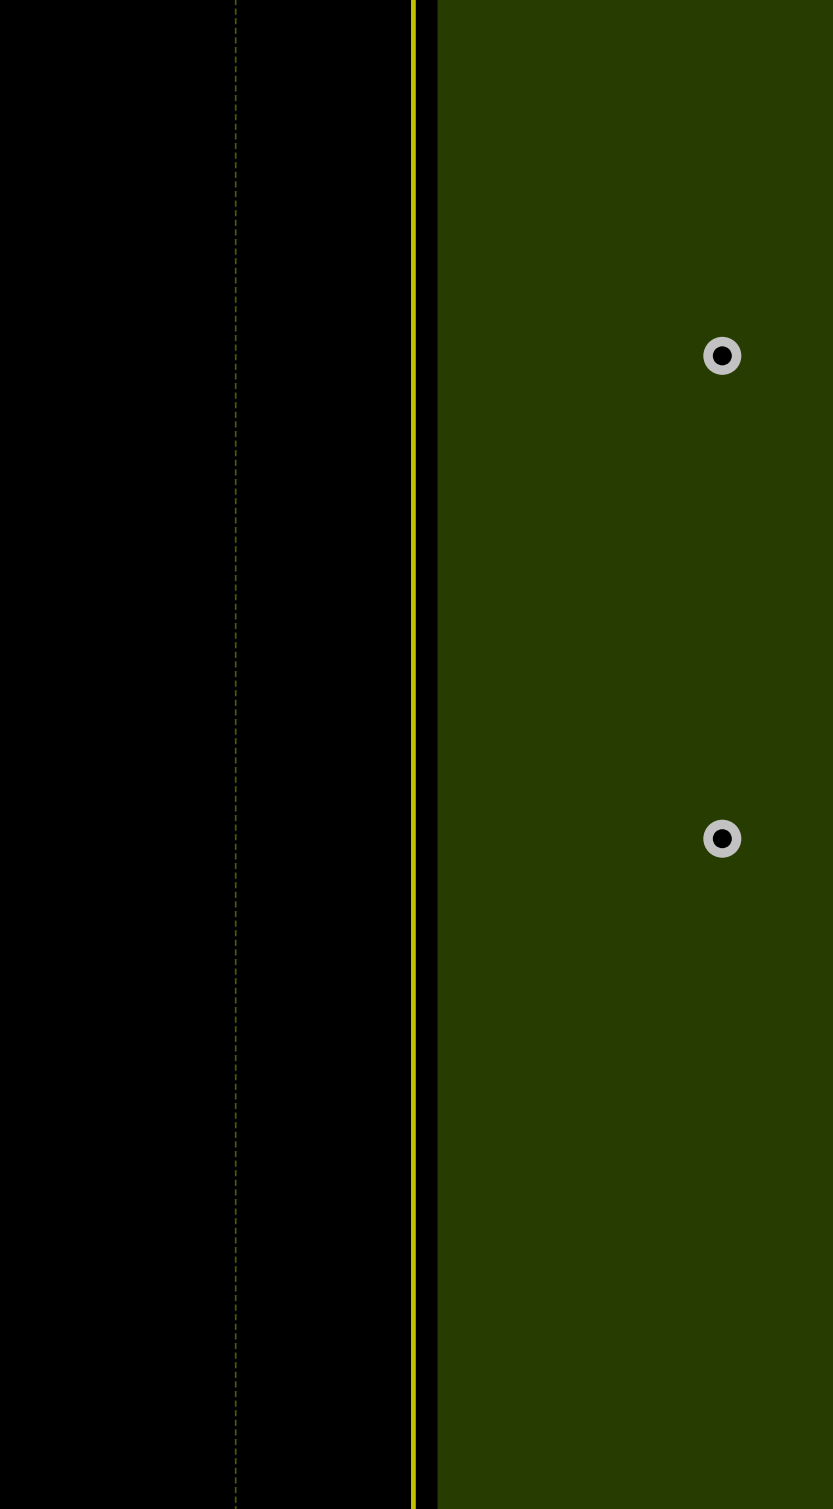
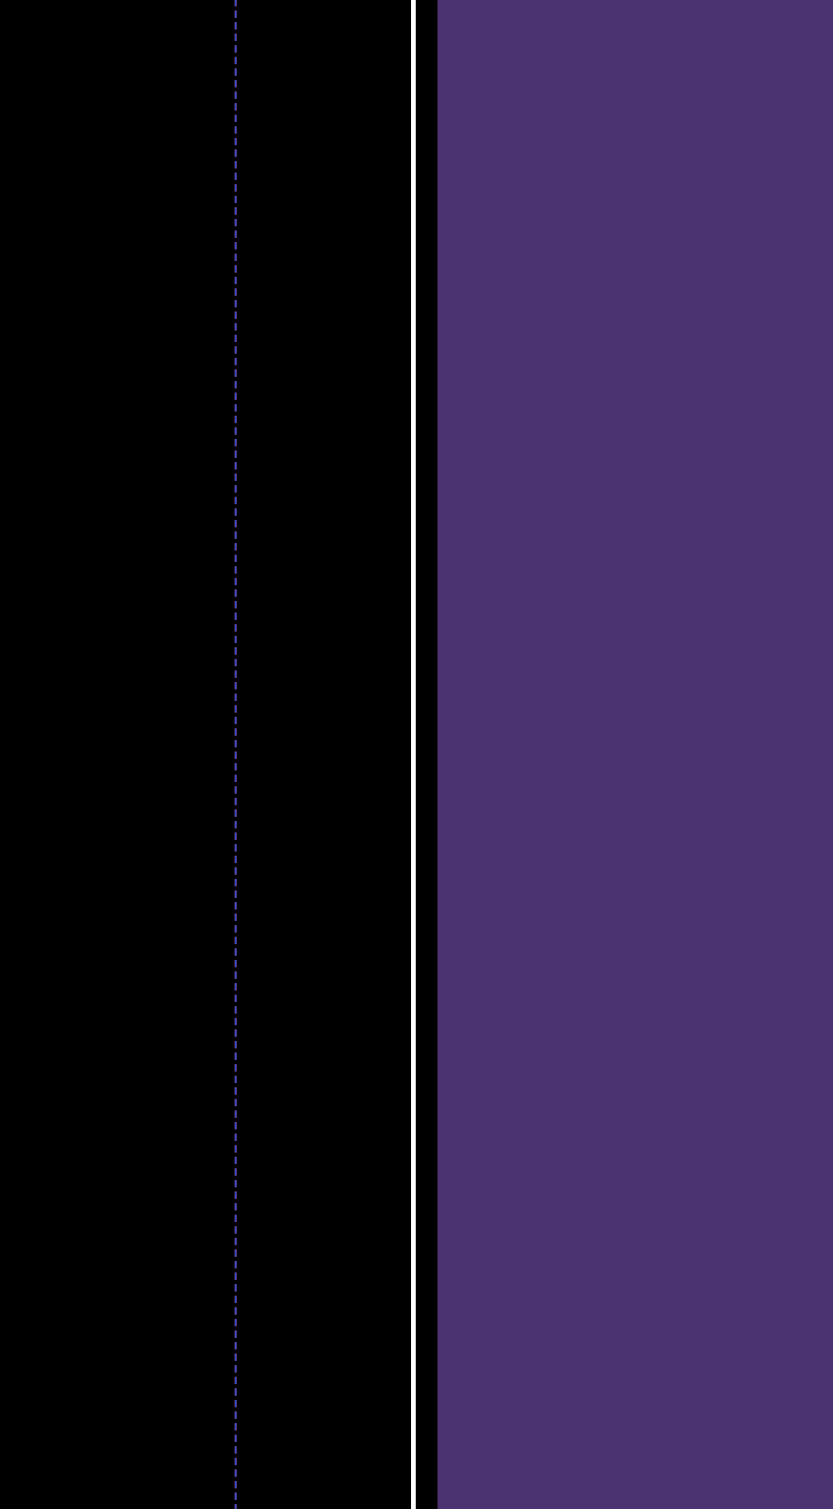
via: (722, 355) -> none
via: (722, 838) -> none

